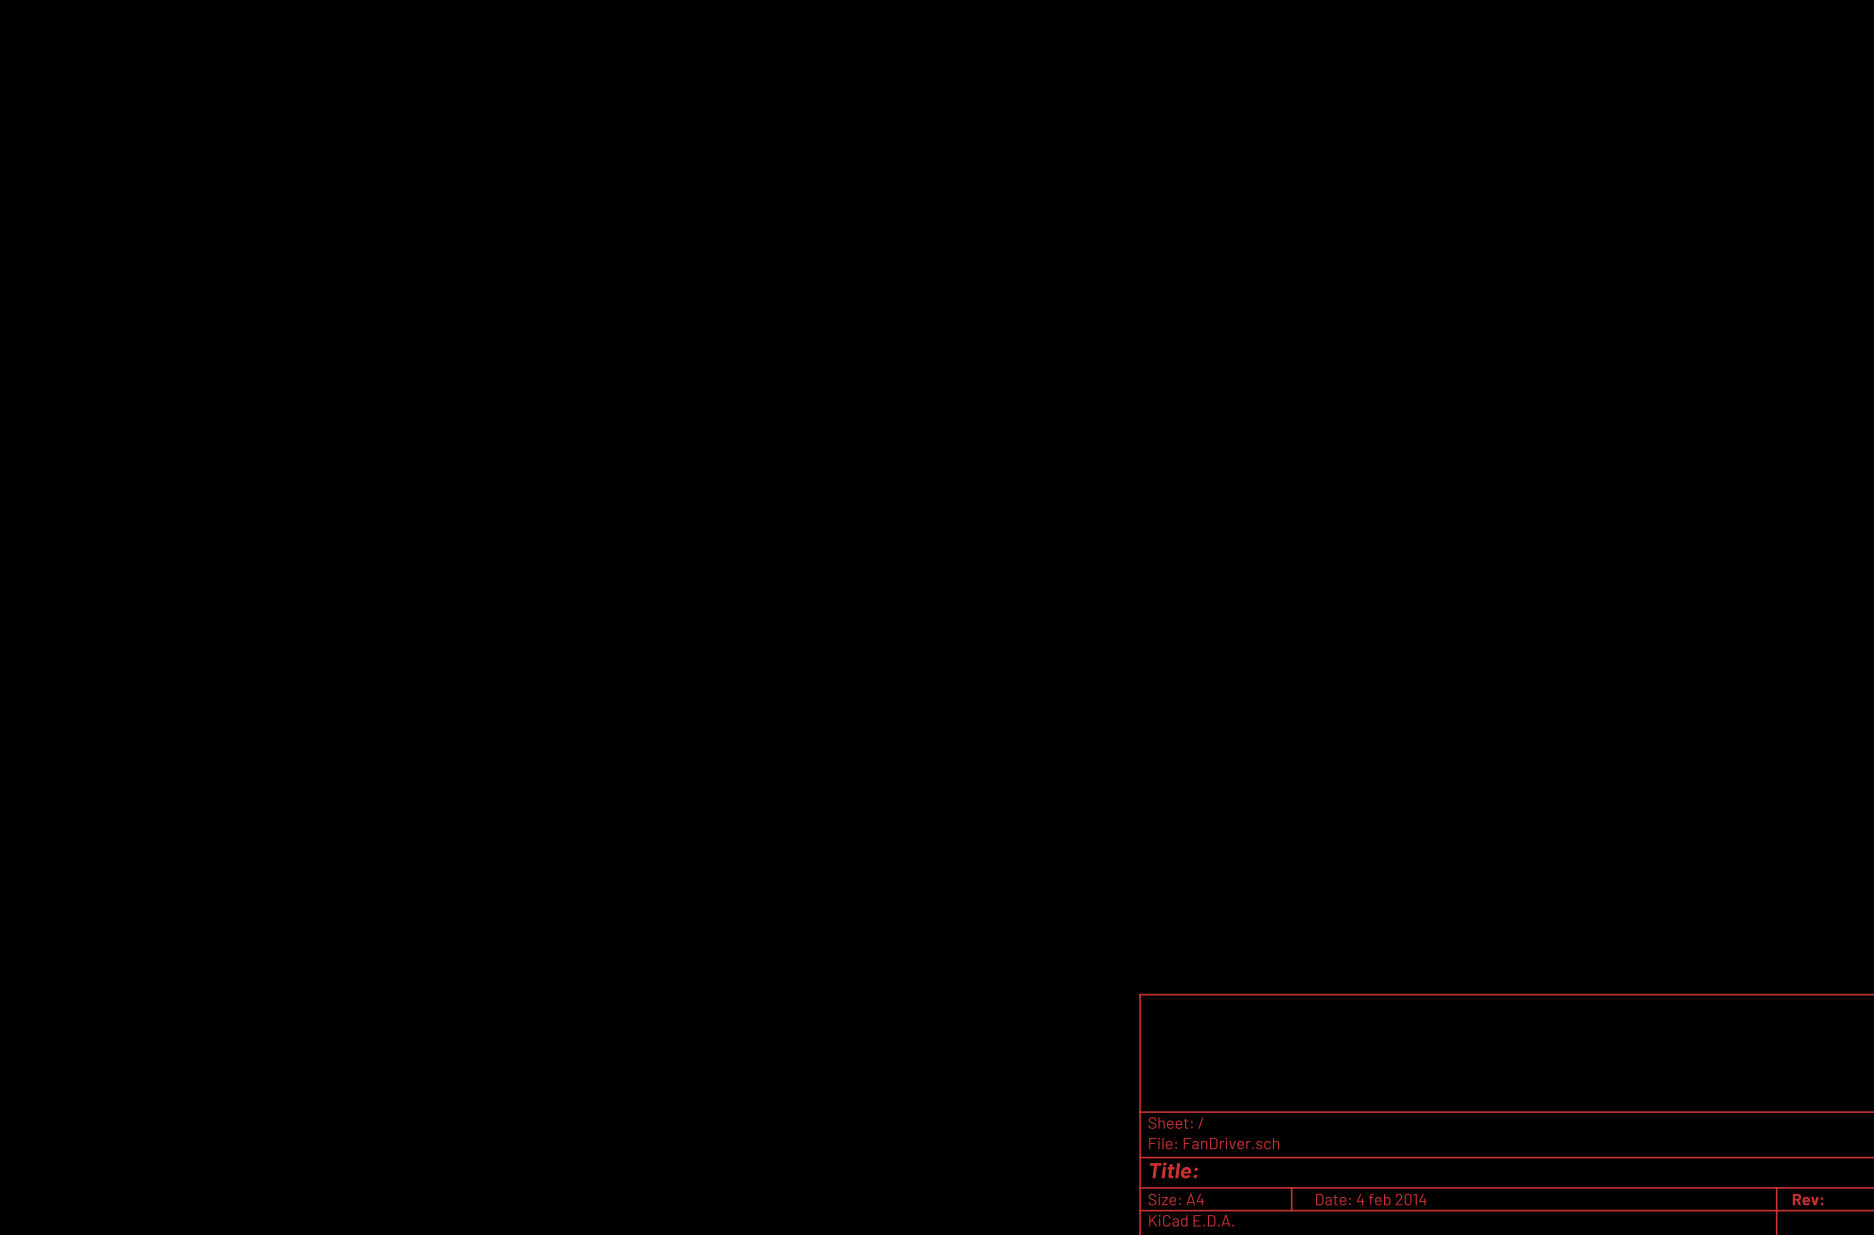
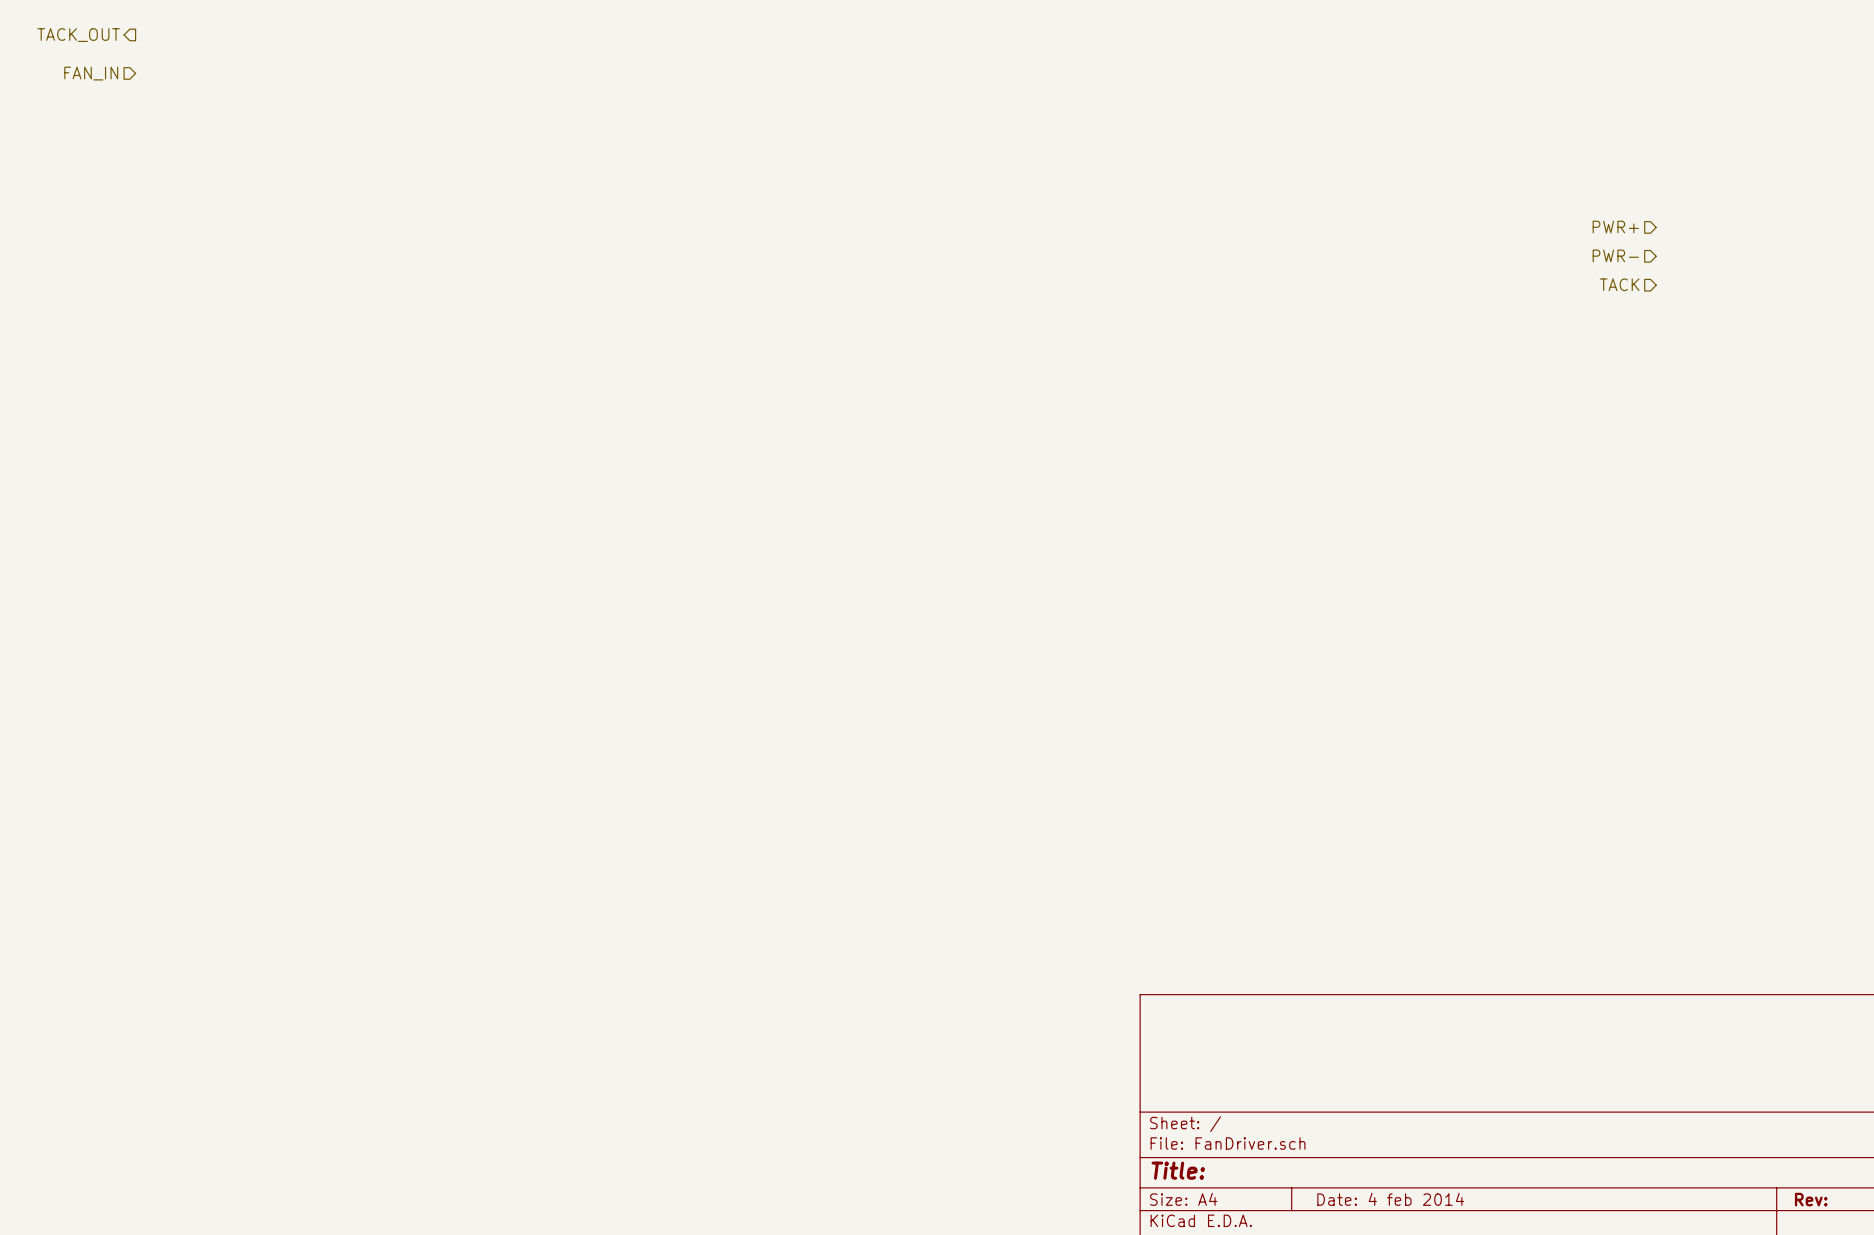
hierarchical label: none -> TACK_OUT (78, 35)
hierarchical label: none -> FAN_IN (91, 73)
hierarchical label: none -> PWR+ (1615, 227)
hierarchical label: none -> PWR- (1615, 255)
hierarchical label: none -> TACK (1619, 284)

